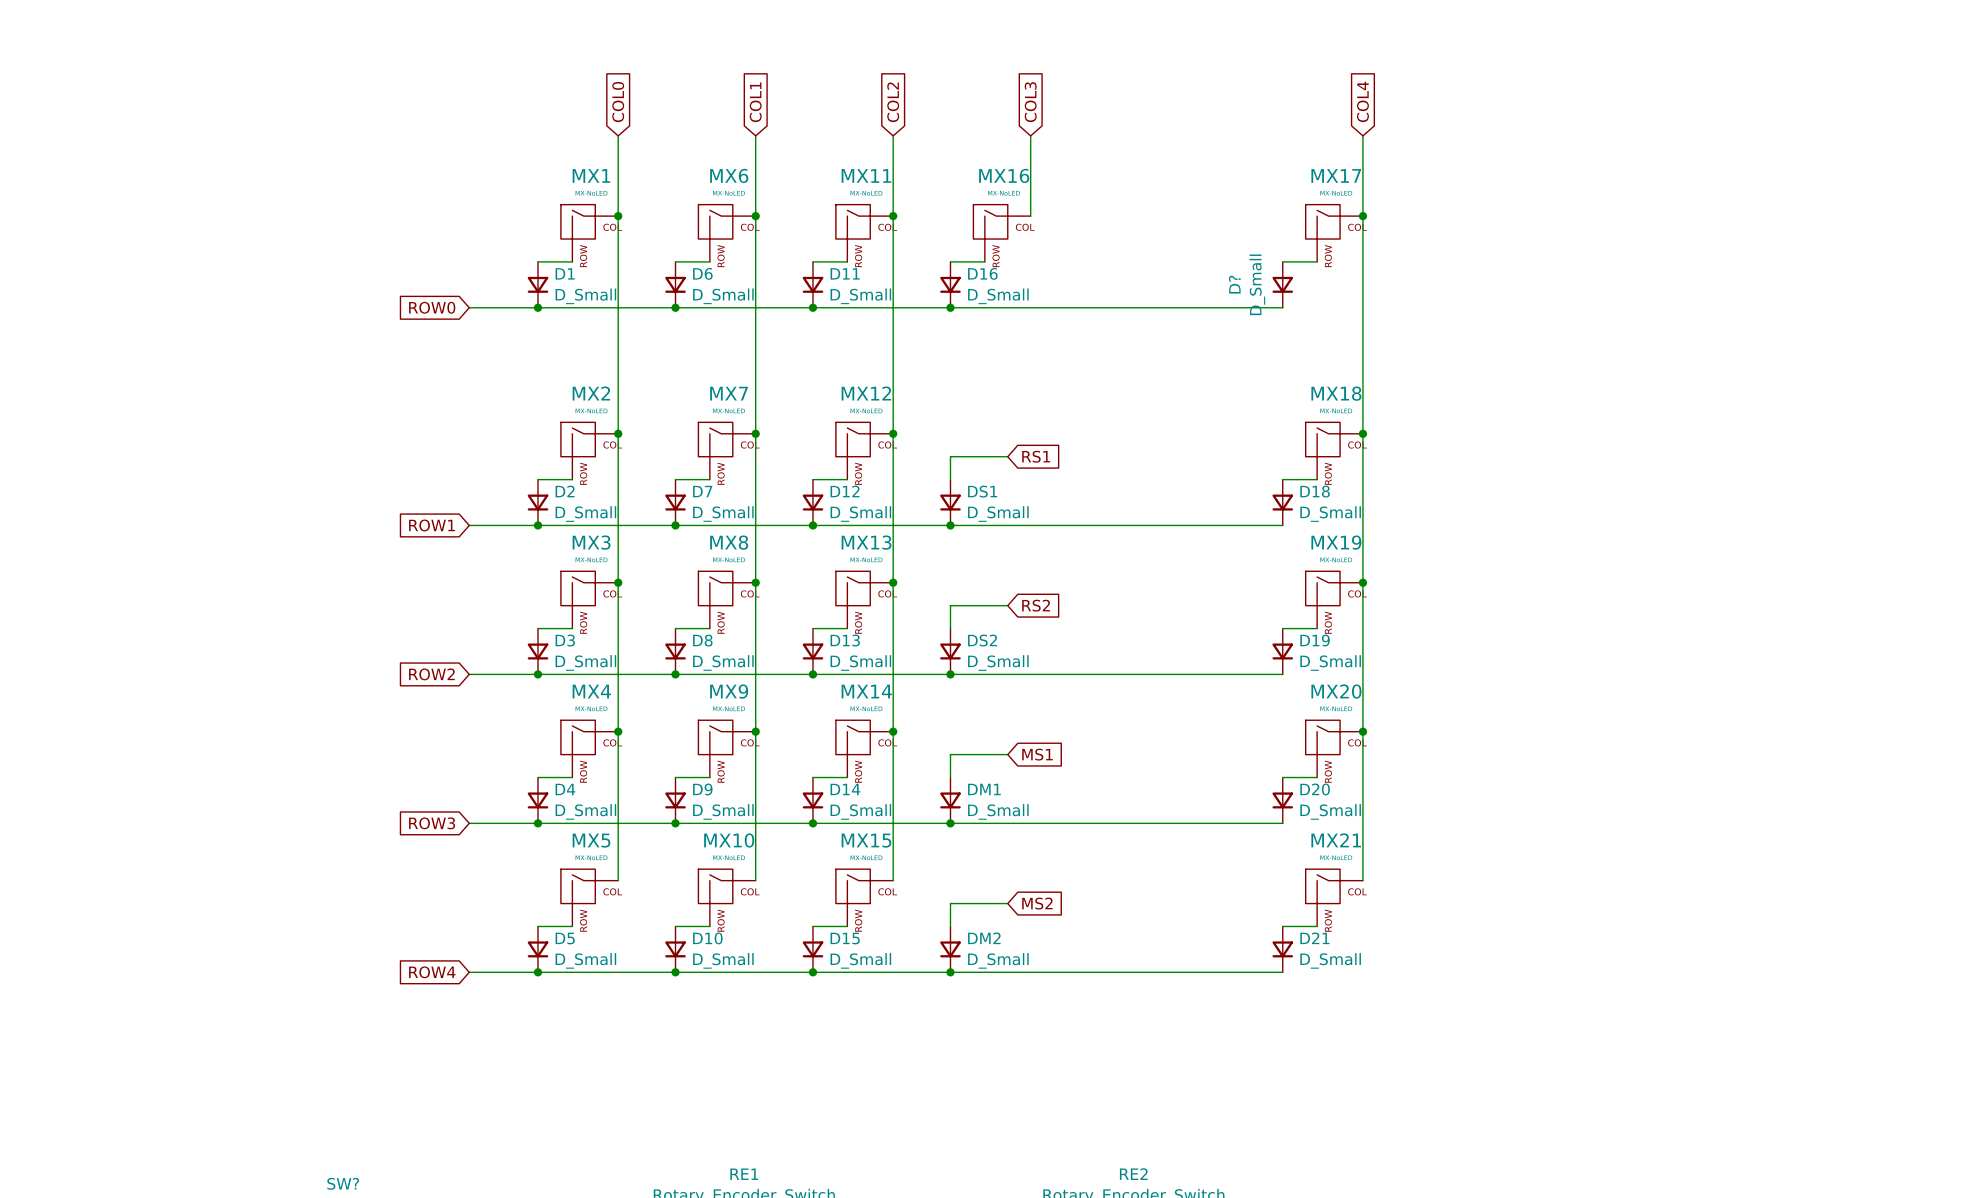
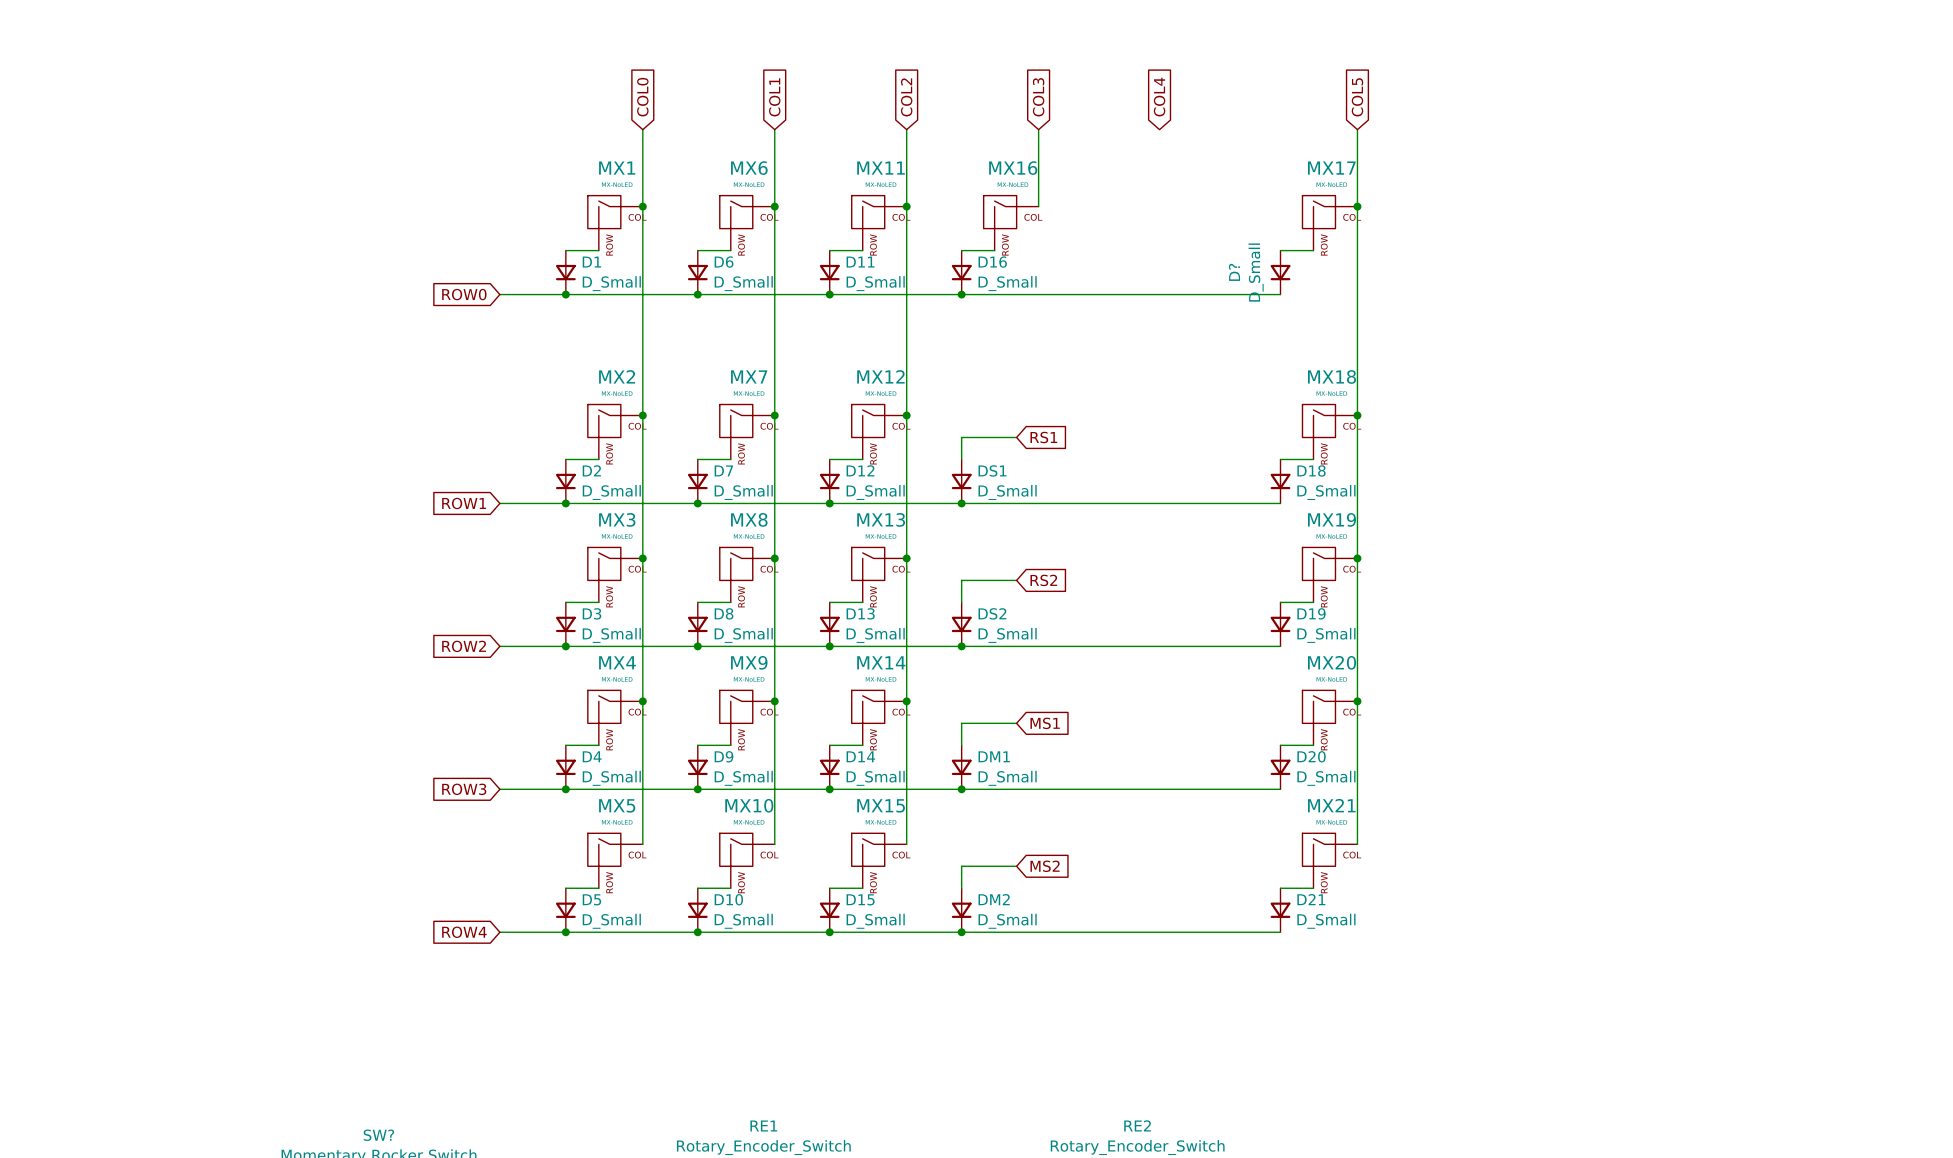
global label: none -> COL4 (1159, 97)
global label: COL4 (1362, 101) -> COL5 (1357, 97)

